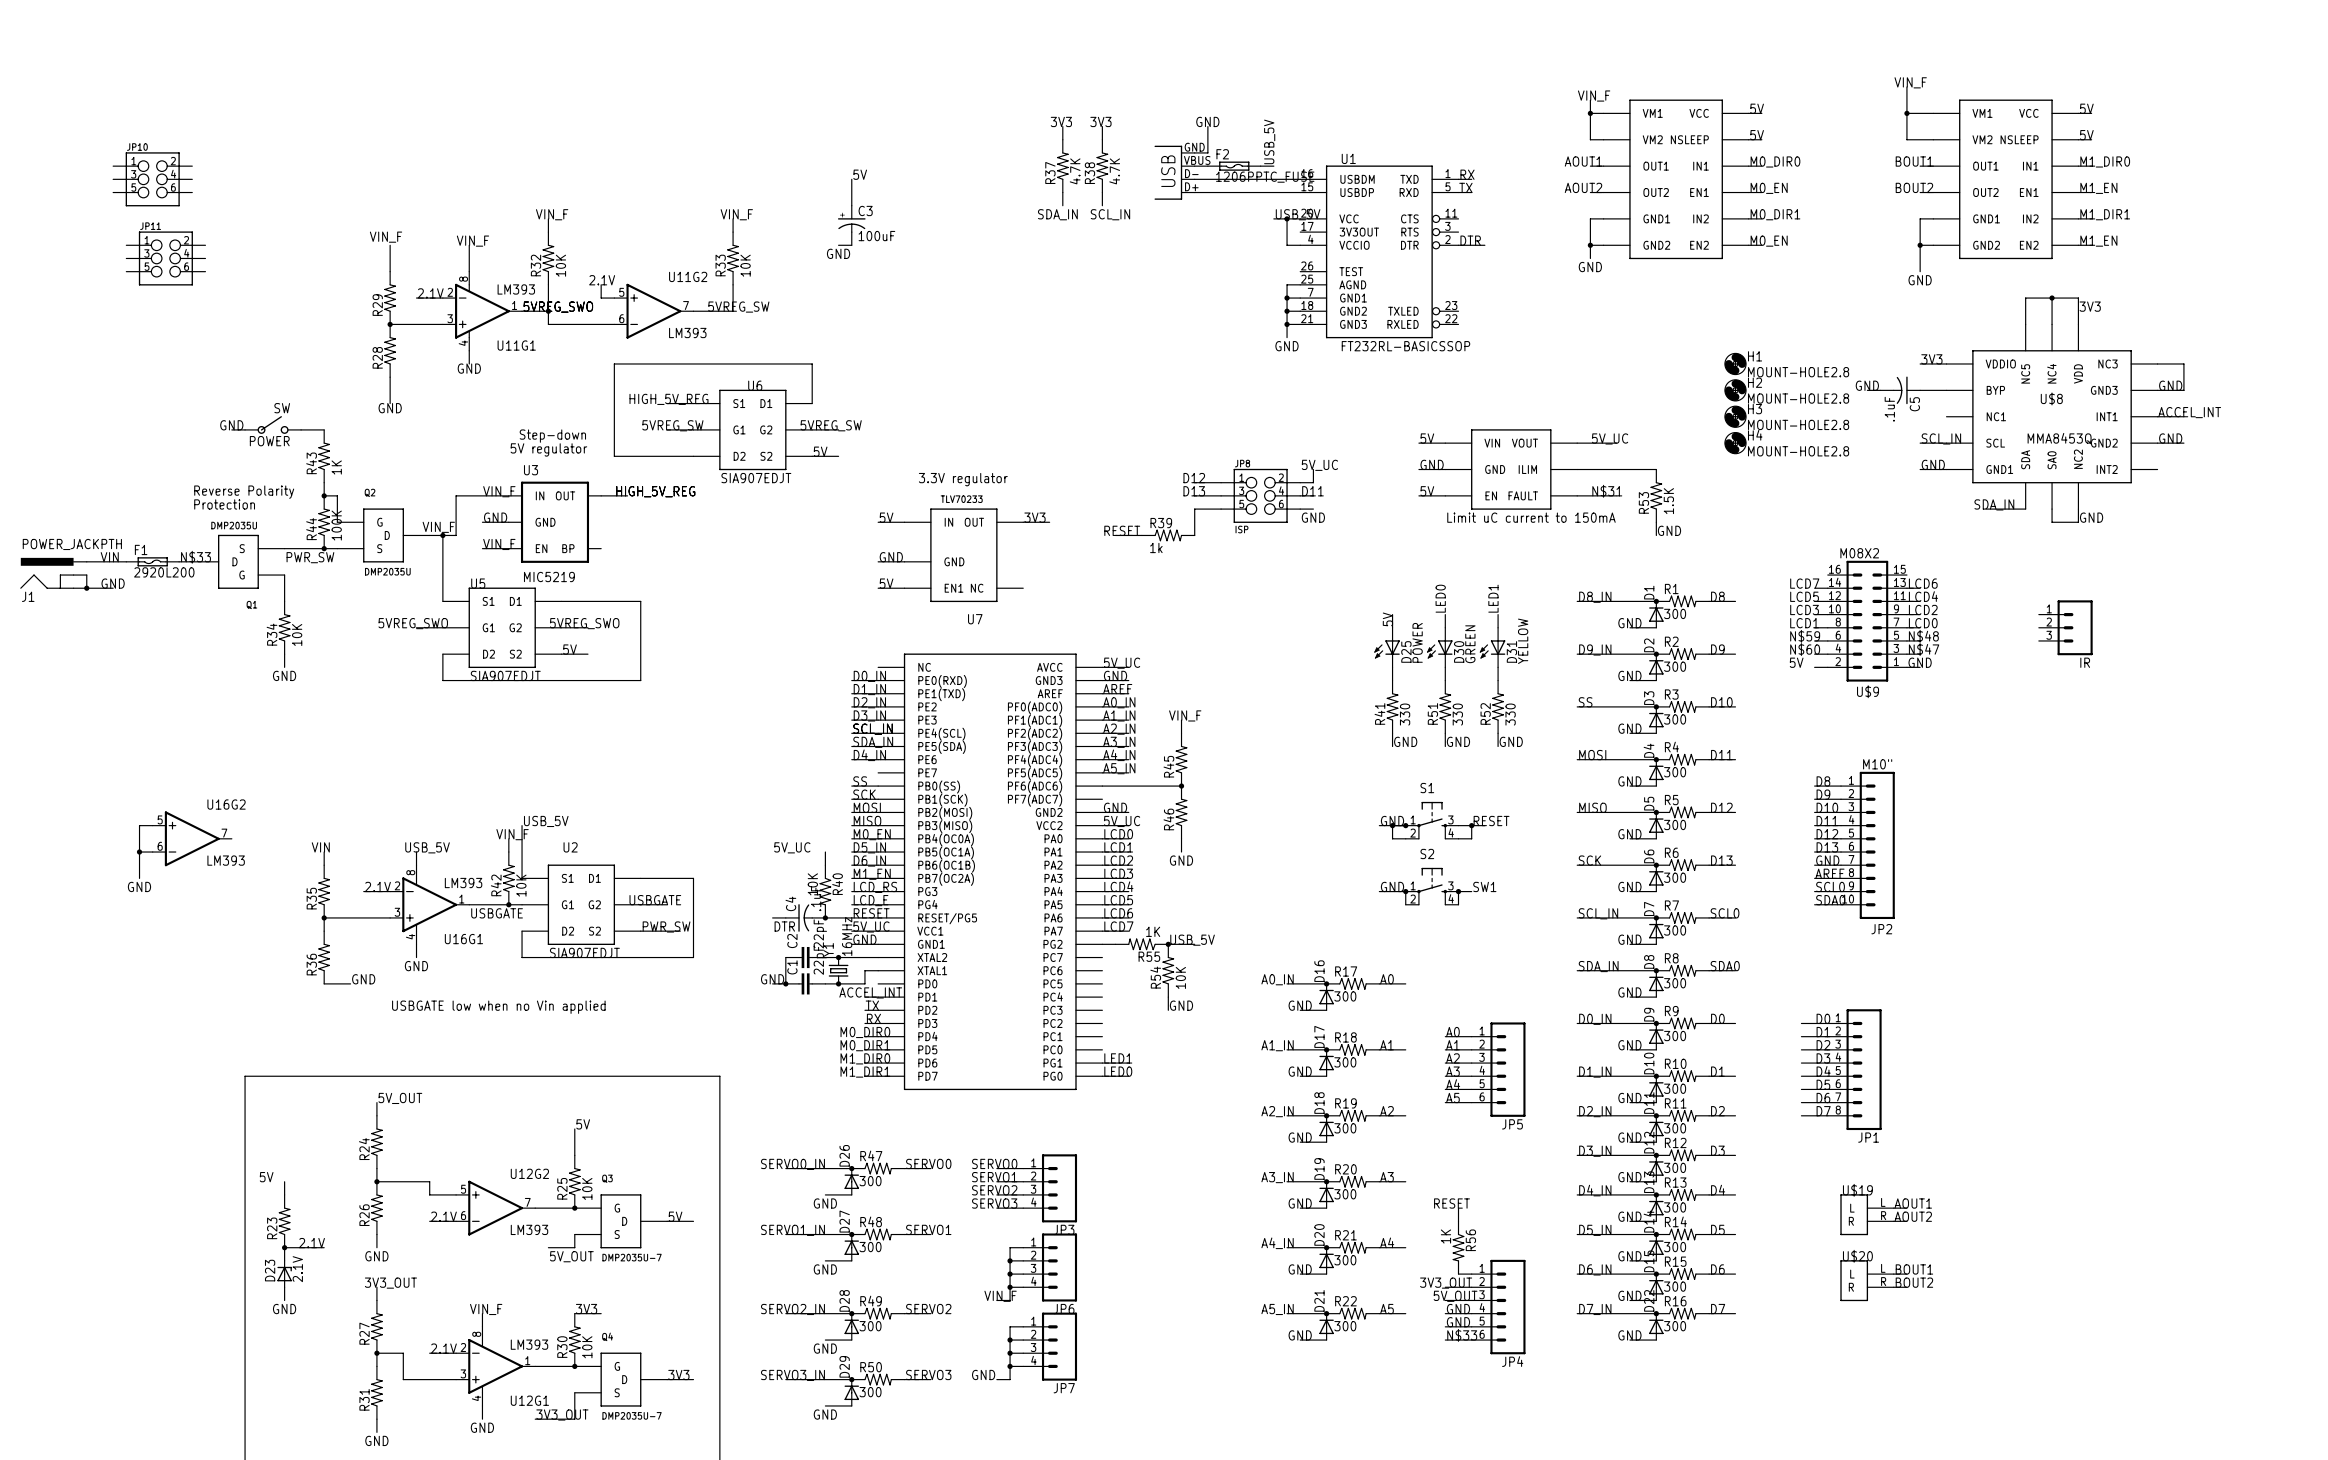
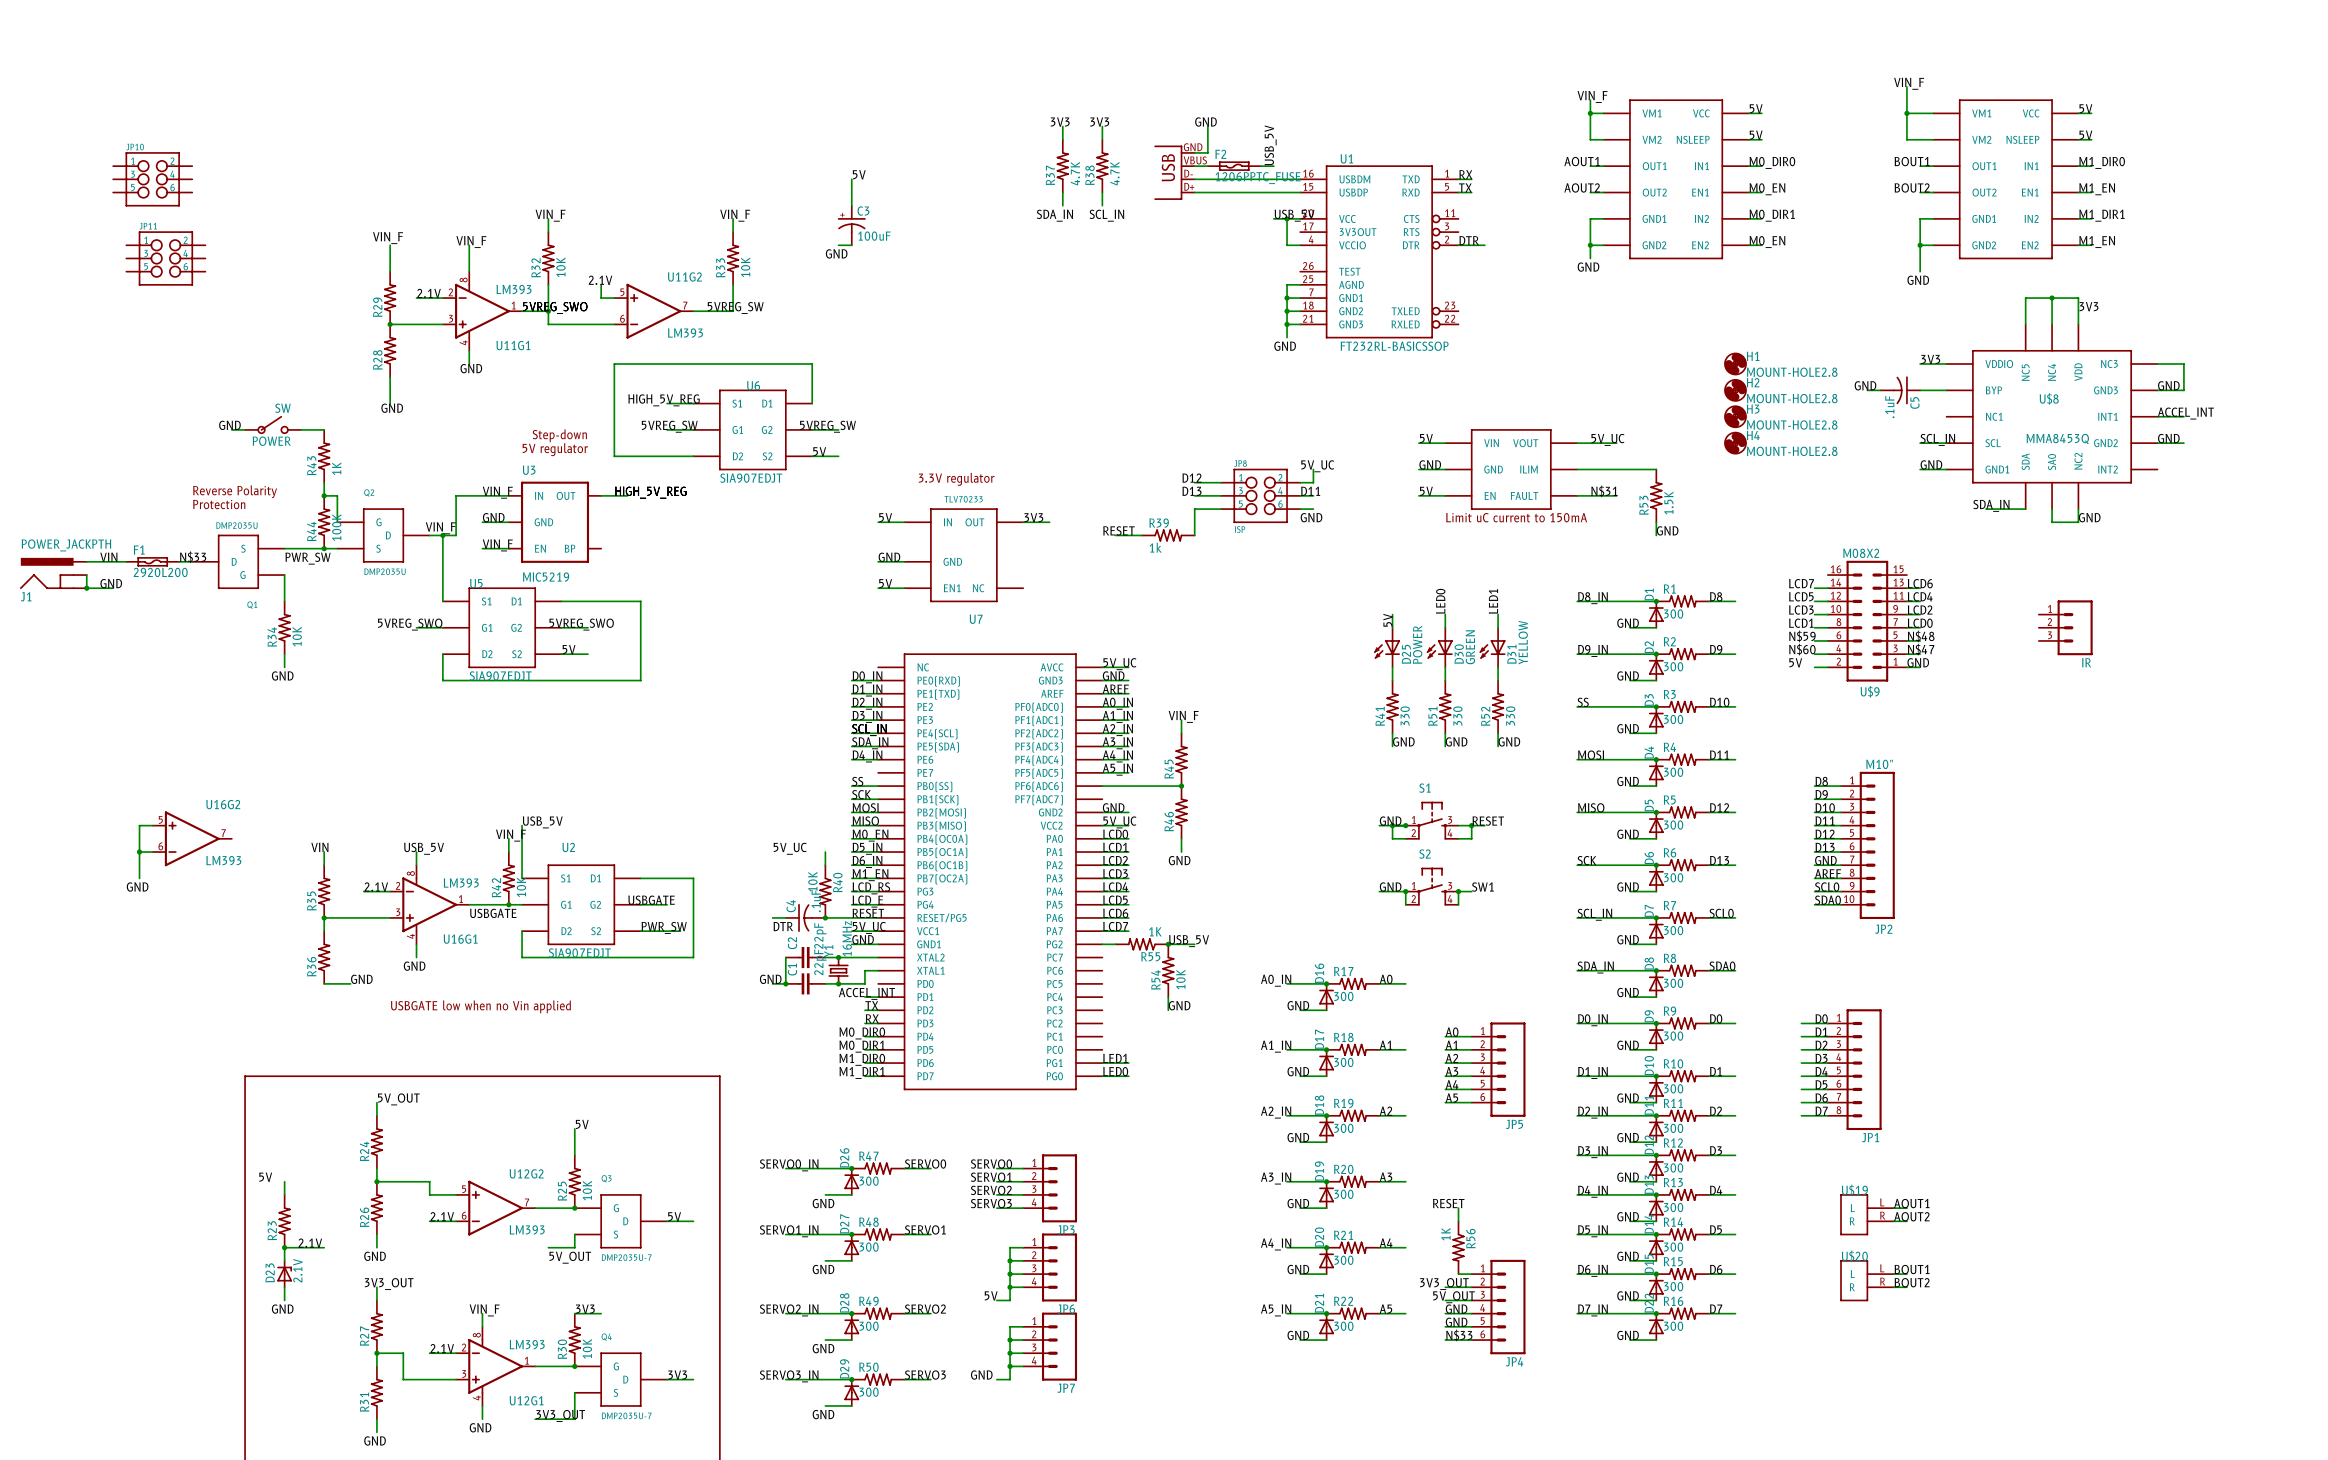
label: VIN_F (1000, 1296) -> 5V (991, 1295)

